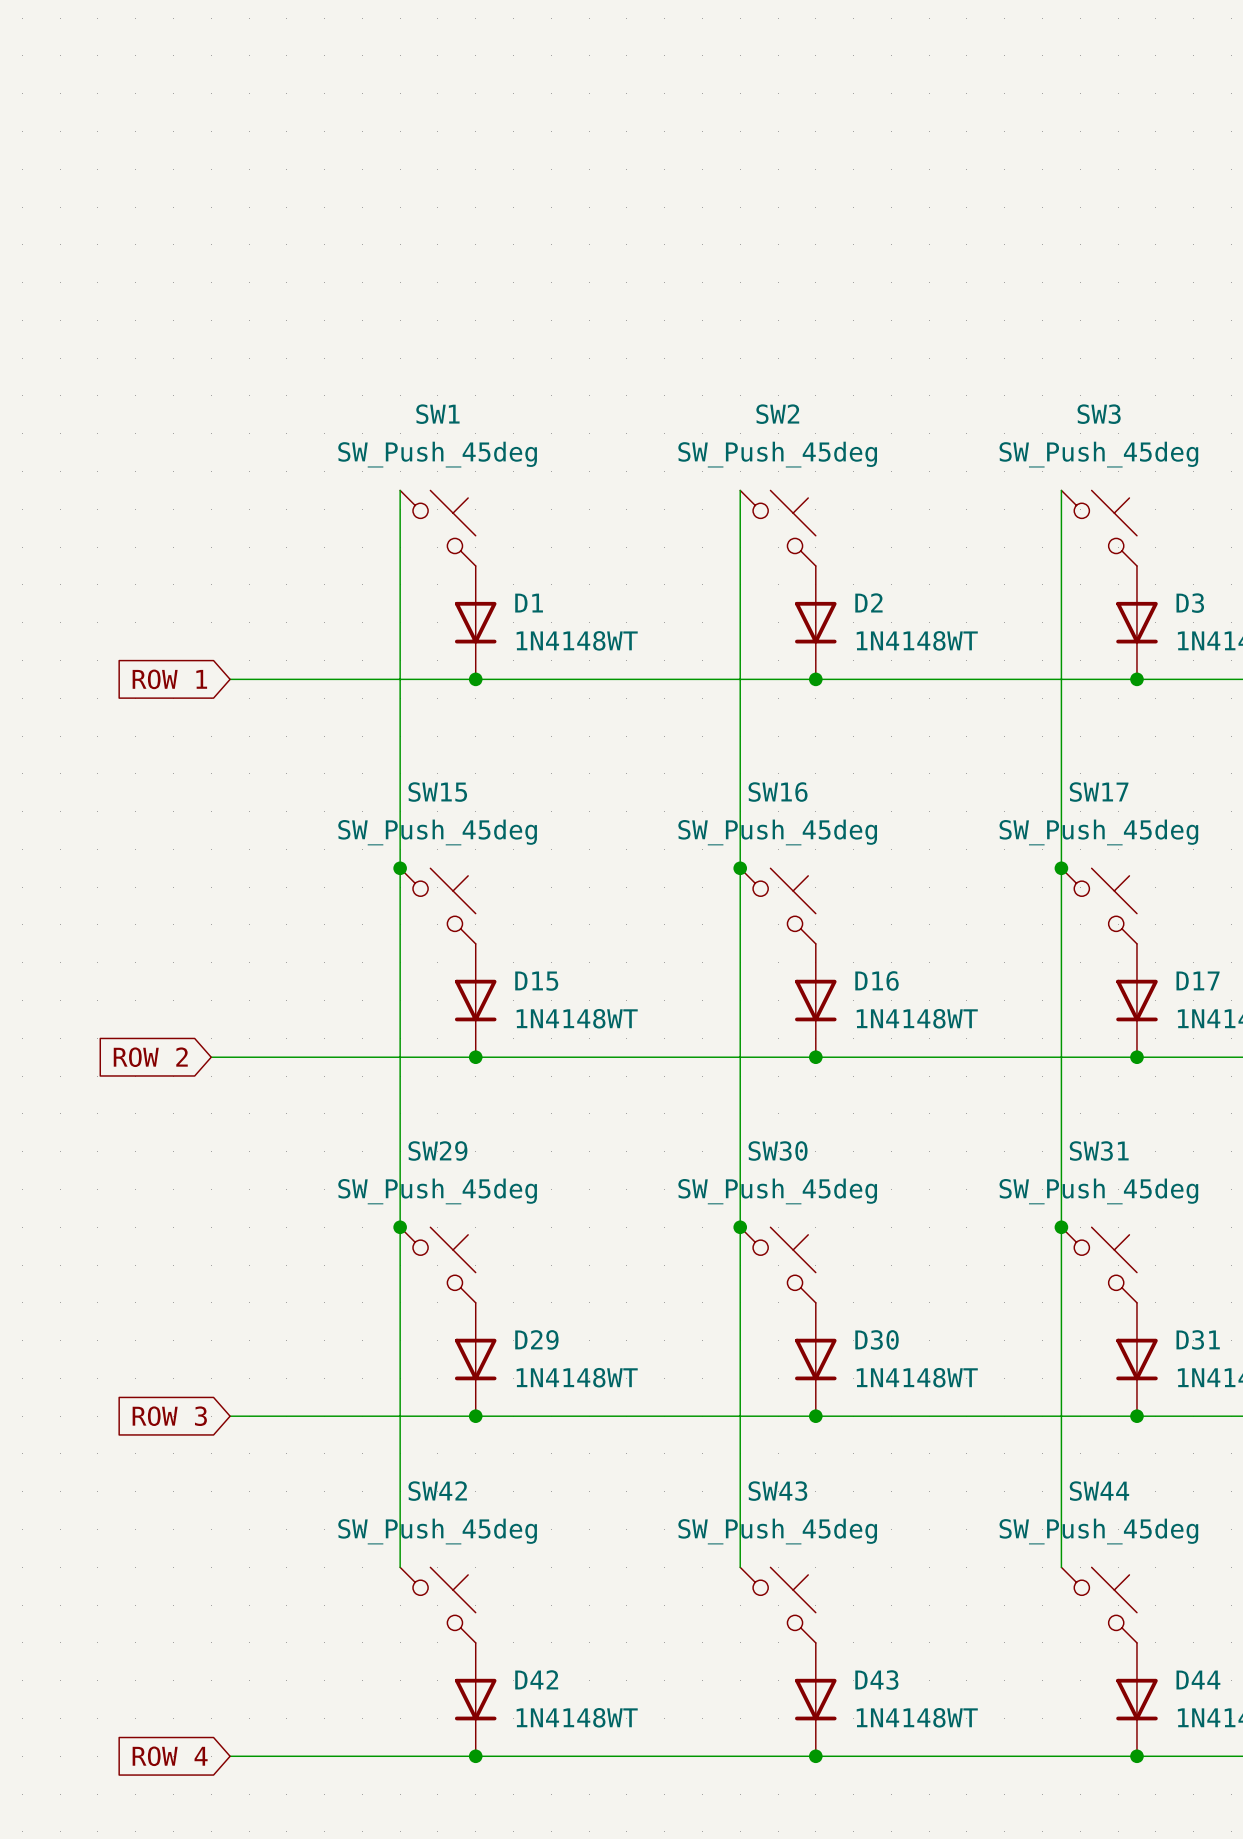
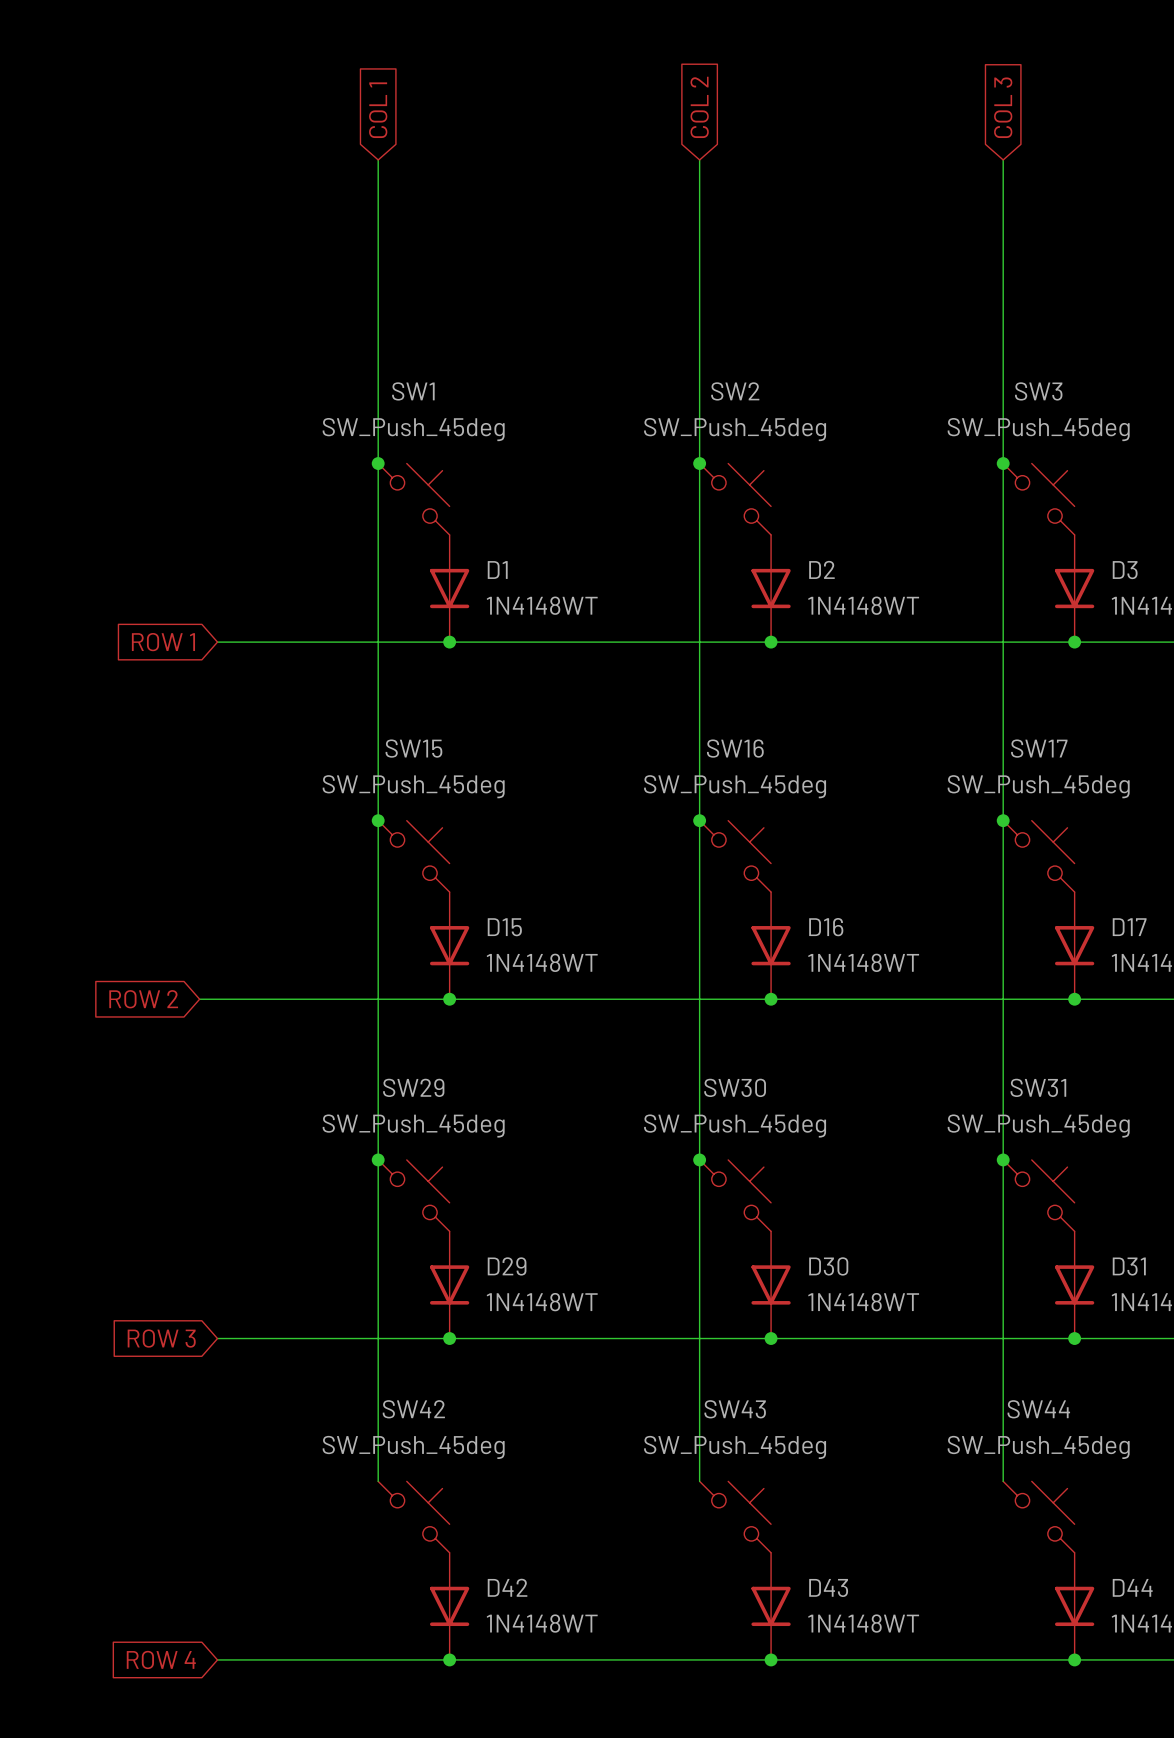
global label: none -> COL 1 (378, 110)
global label: none -> COL 2 (699, 107)
global label: none -> COL 3 (1003, 107)
wire: none -> (378, 159) (378, 463)
wire: none -> (699, 159) (699, 463)
wire: none -> (1003, 159) (1003, 463)
junction: none -> (378, 463)
junction: none -> (699, 463)
junction: none -> (1003, 463)

